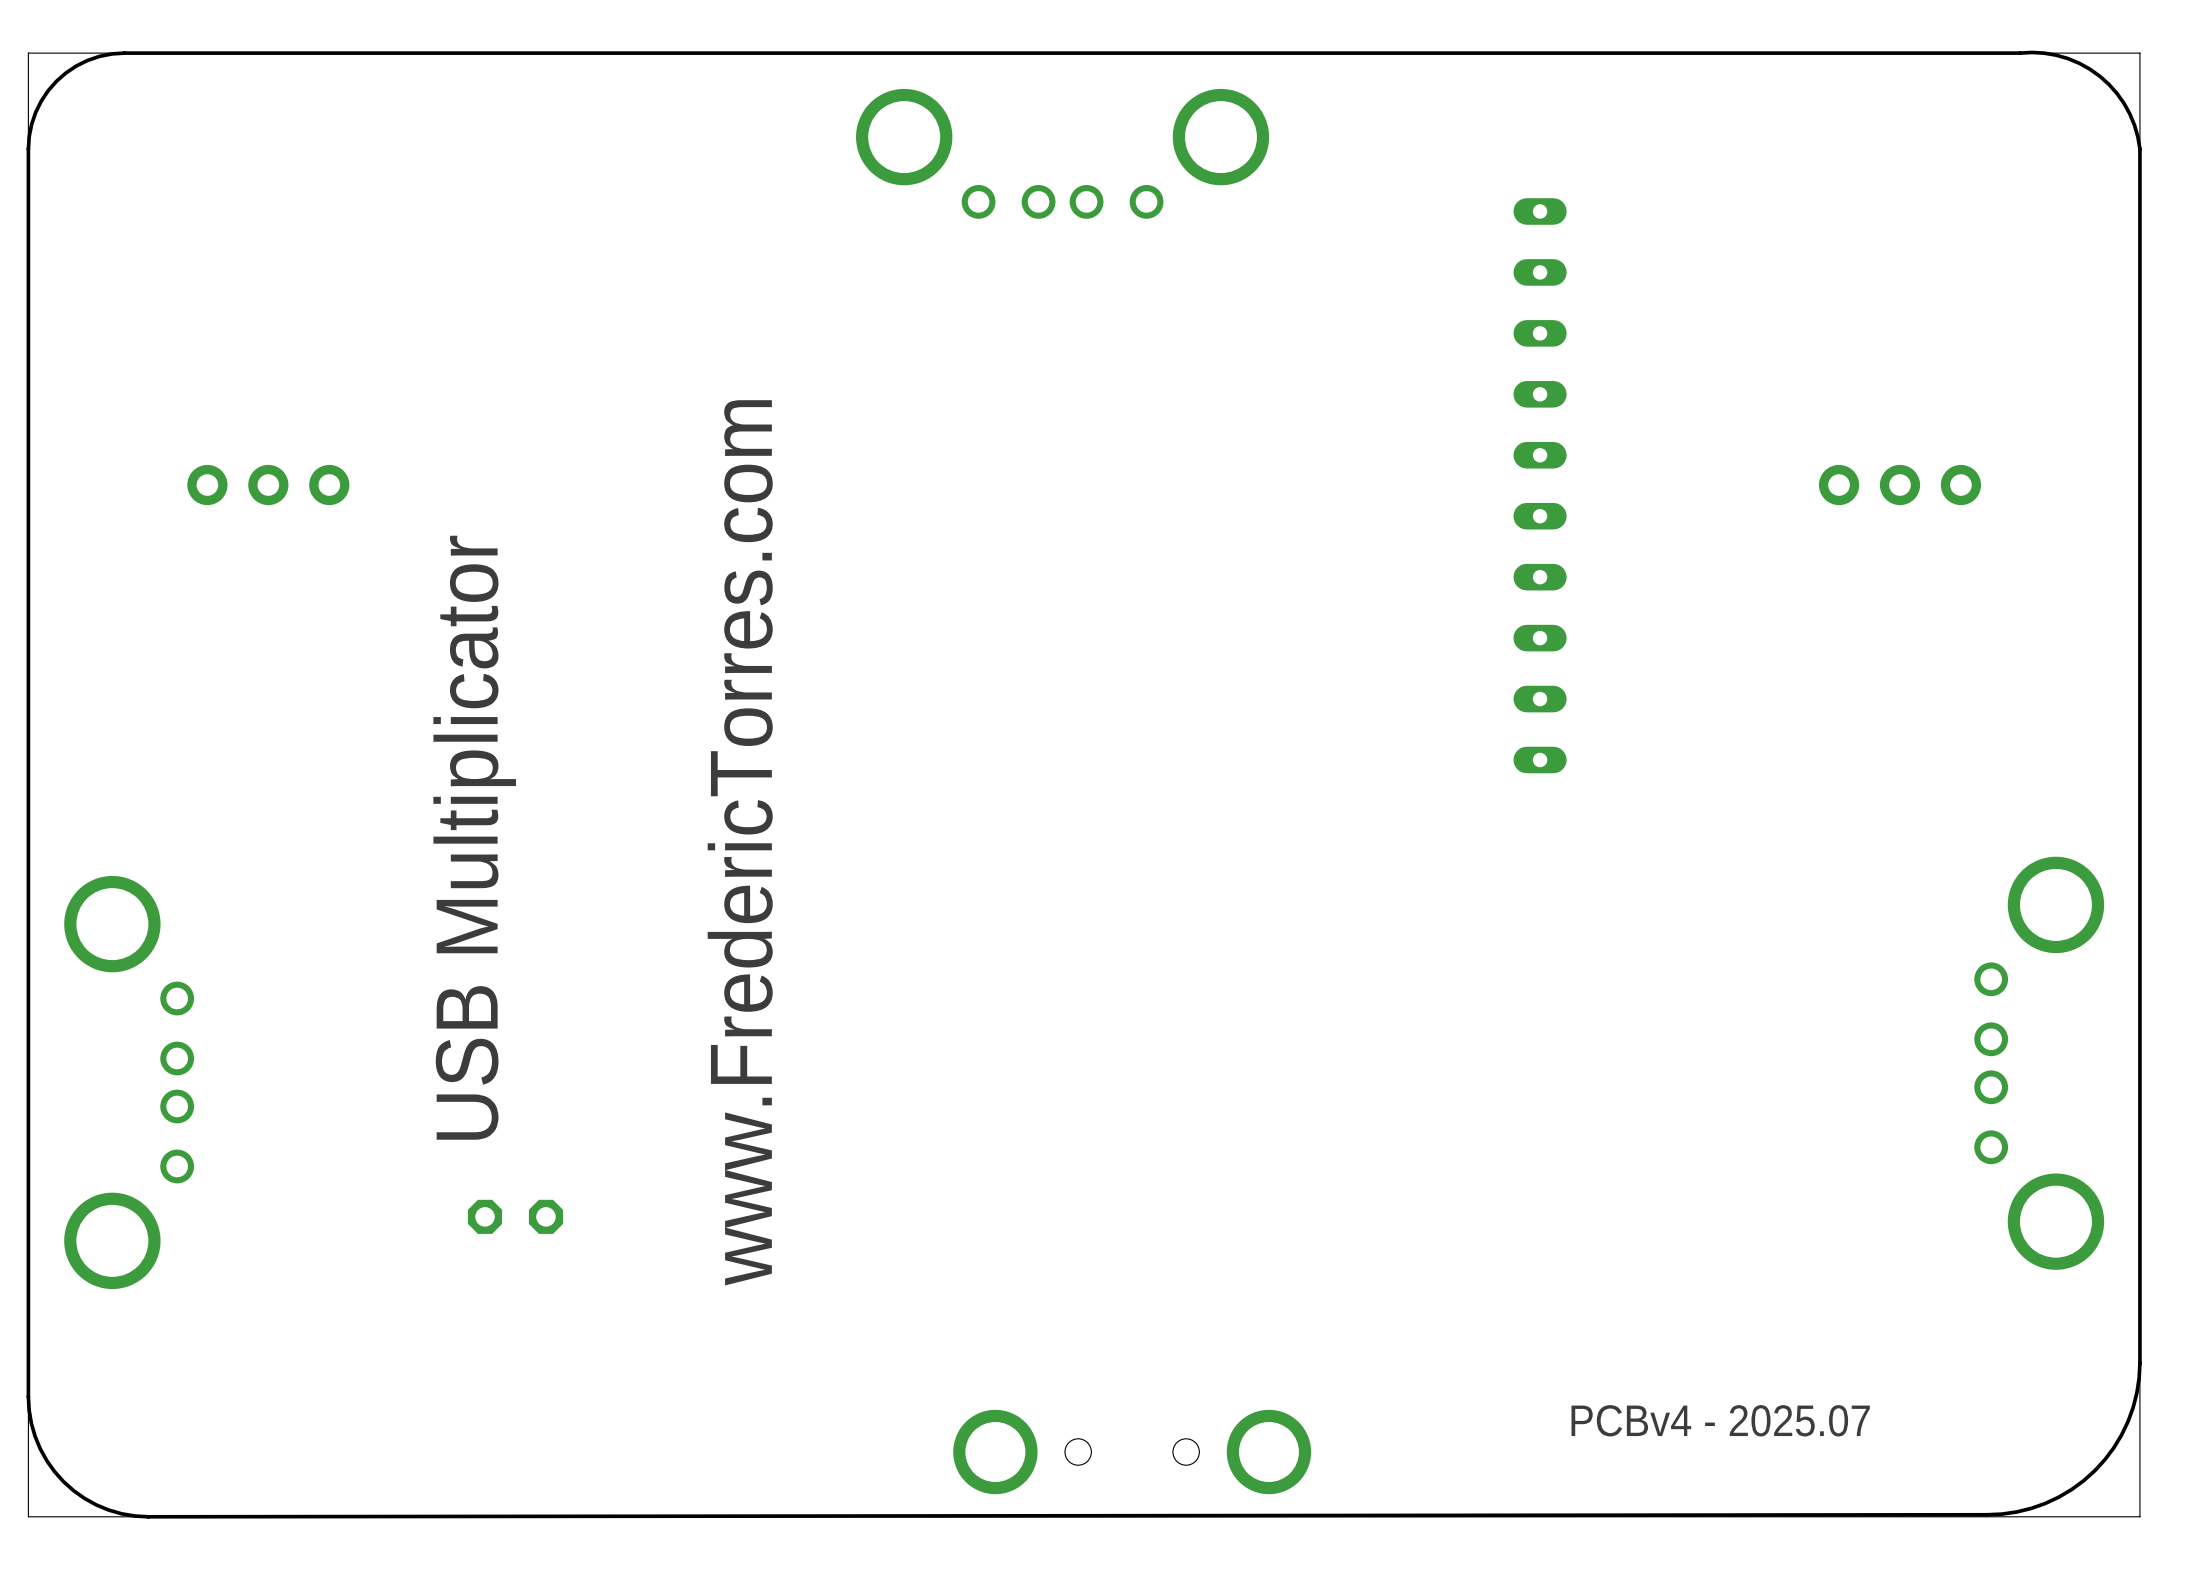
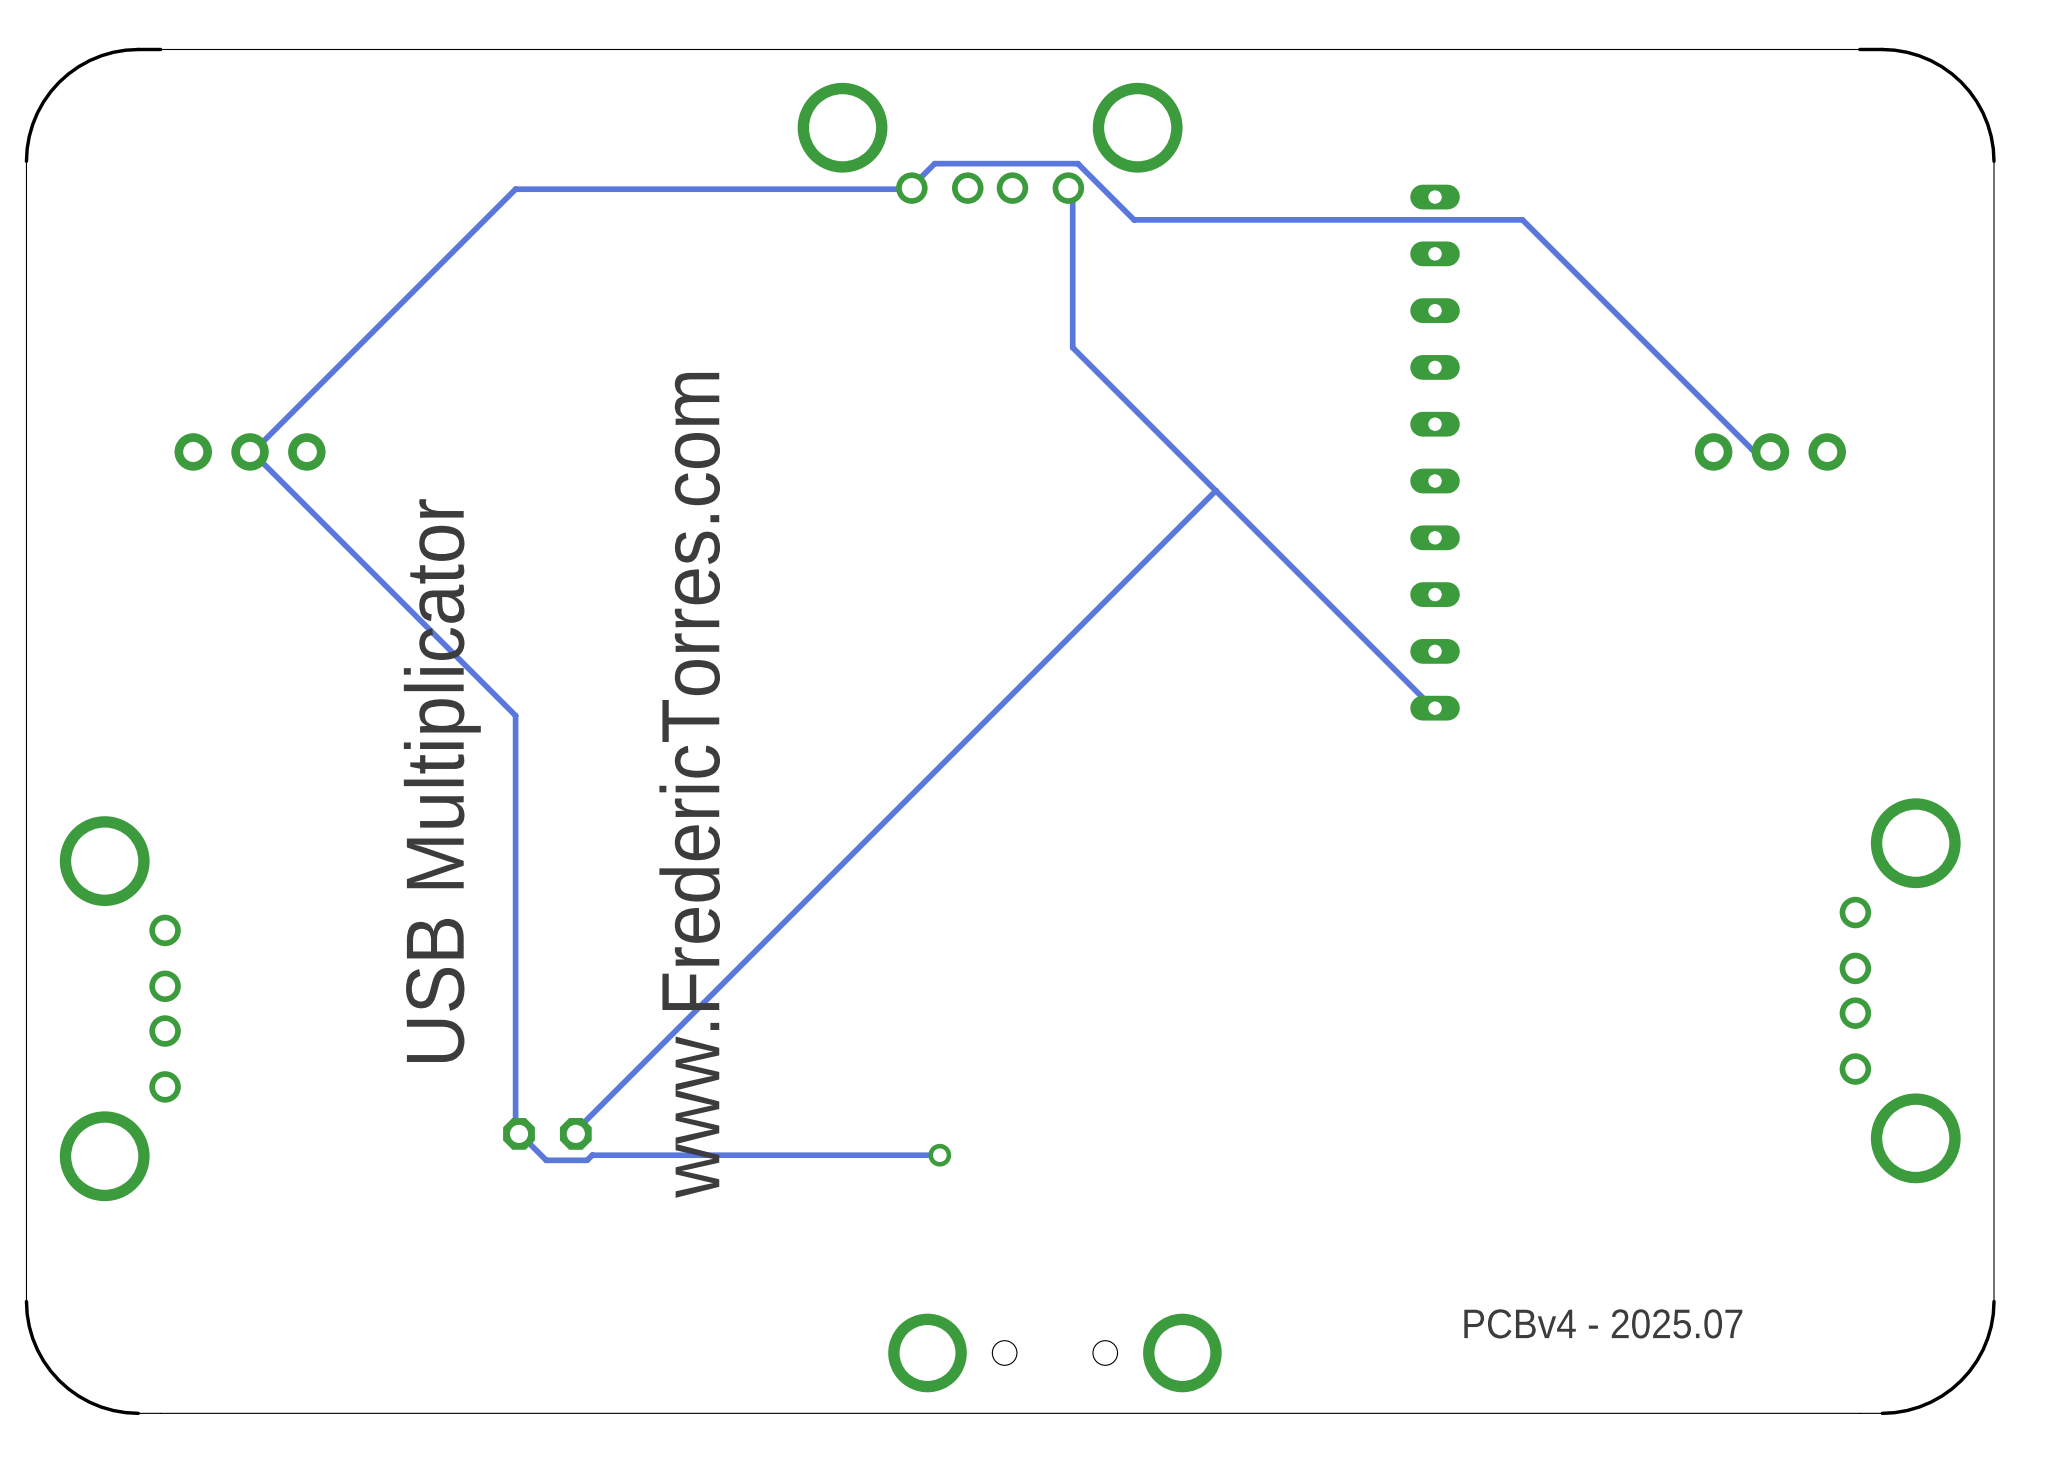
board edge: (2019, 53) (2044, 53) (2068, 58) (2099, 76) (2124, 103) (2134, 125) (2139, 149) (2139, 1363) (2133, 1407) (2121, 1434) (2104, 1459) (2071, 1489) (2031, 1508) (1987, 1514) (28, 1516) (29, 136) (31, 124) (41, 101) (56, 81) (65, 72) (76, 65) (99, 56) (111, 53) (148, 53) -> (1882, 49) (1919, 55) (1941, 66) (1961, 82) (1976, 101) (1987, 124) (1994, 161)
board edge: (2139, 173) (2139, 53) (28, 53) (28, 173) -> (138, 49) (101, 55) (78, 66) (59, 82) (43, 101) (32, 124) (26, 161)
track: none -> (1068, 188) (1072, 189) (1072, 347) (1435, 708)
track: none -> (1770, 451) (1767, 449) (1752, 449) (1522, 219) (1134, 219) (1077, 163) (934, 163) (909, 189) (515, 189) (254, 449) (250, 451) (515, 715) (515, 1129) (546, 1160) (587, 1160) (592, 1155) (939, 1155)
track: none -> (1215, 490) (576, 1129) (575, 1133)
part position: (515, 1216) -> (547, 1133)
via: none -> (939, 1155)
board edge: (2139, 1396) (2139, 1516) (2019, 1516) -> (1994, 1301) (1987, 1338) (1976, 1361) (1961, 1380) (1941, 1396) (1919, 1407) (1882, 1413)

